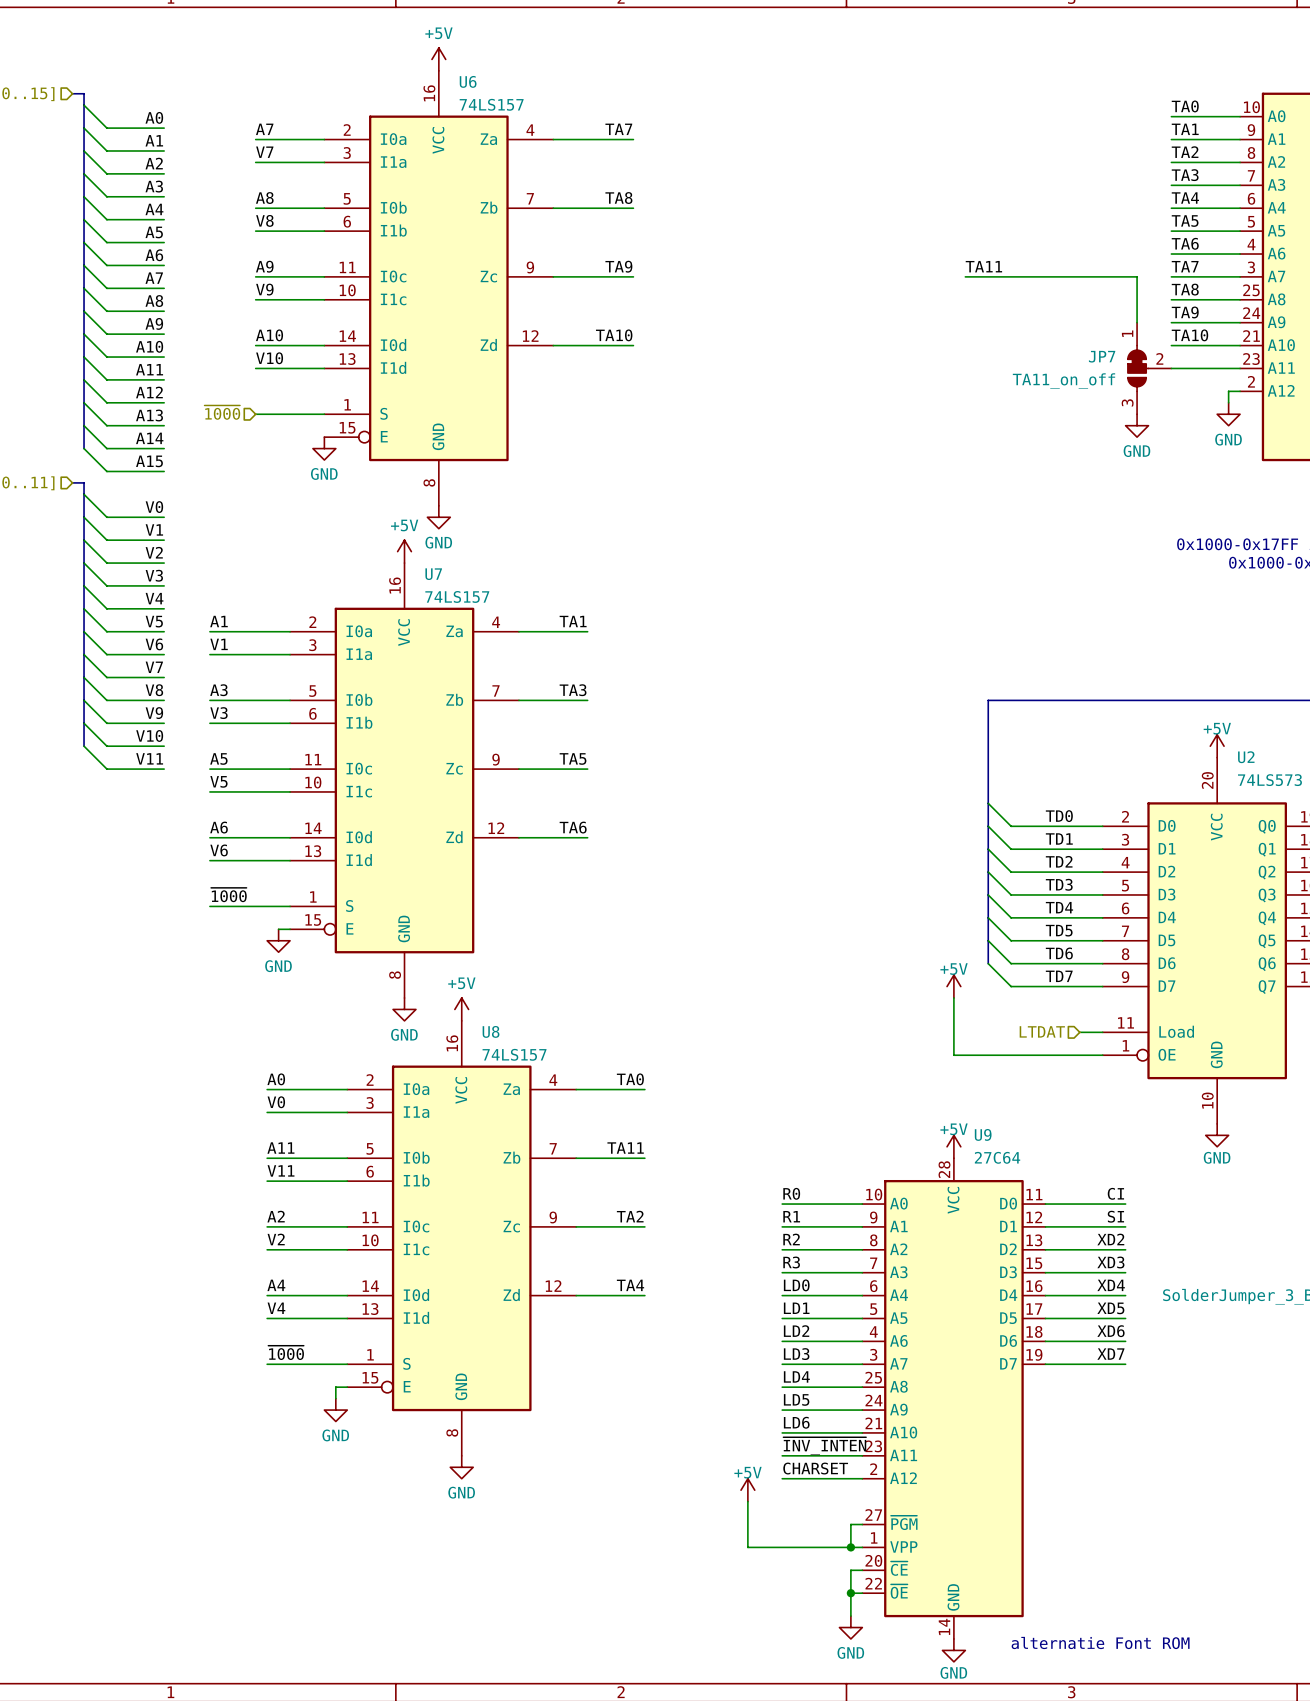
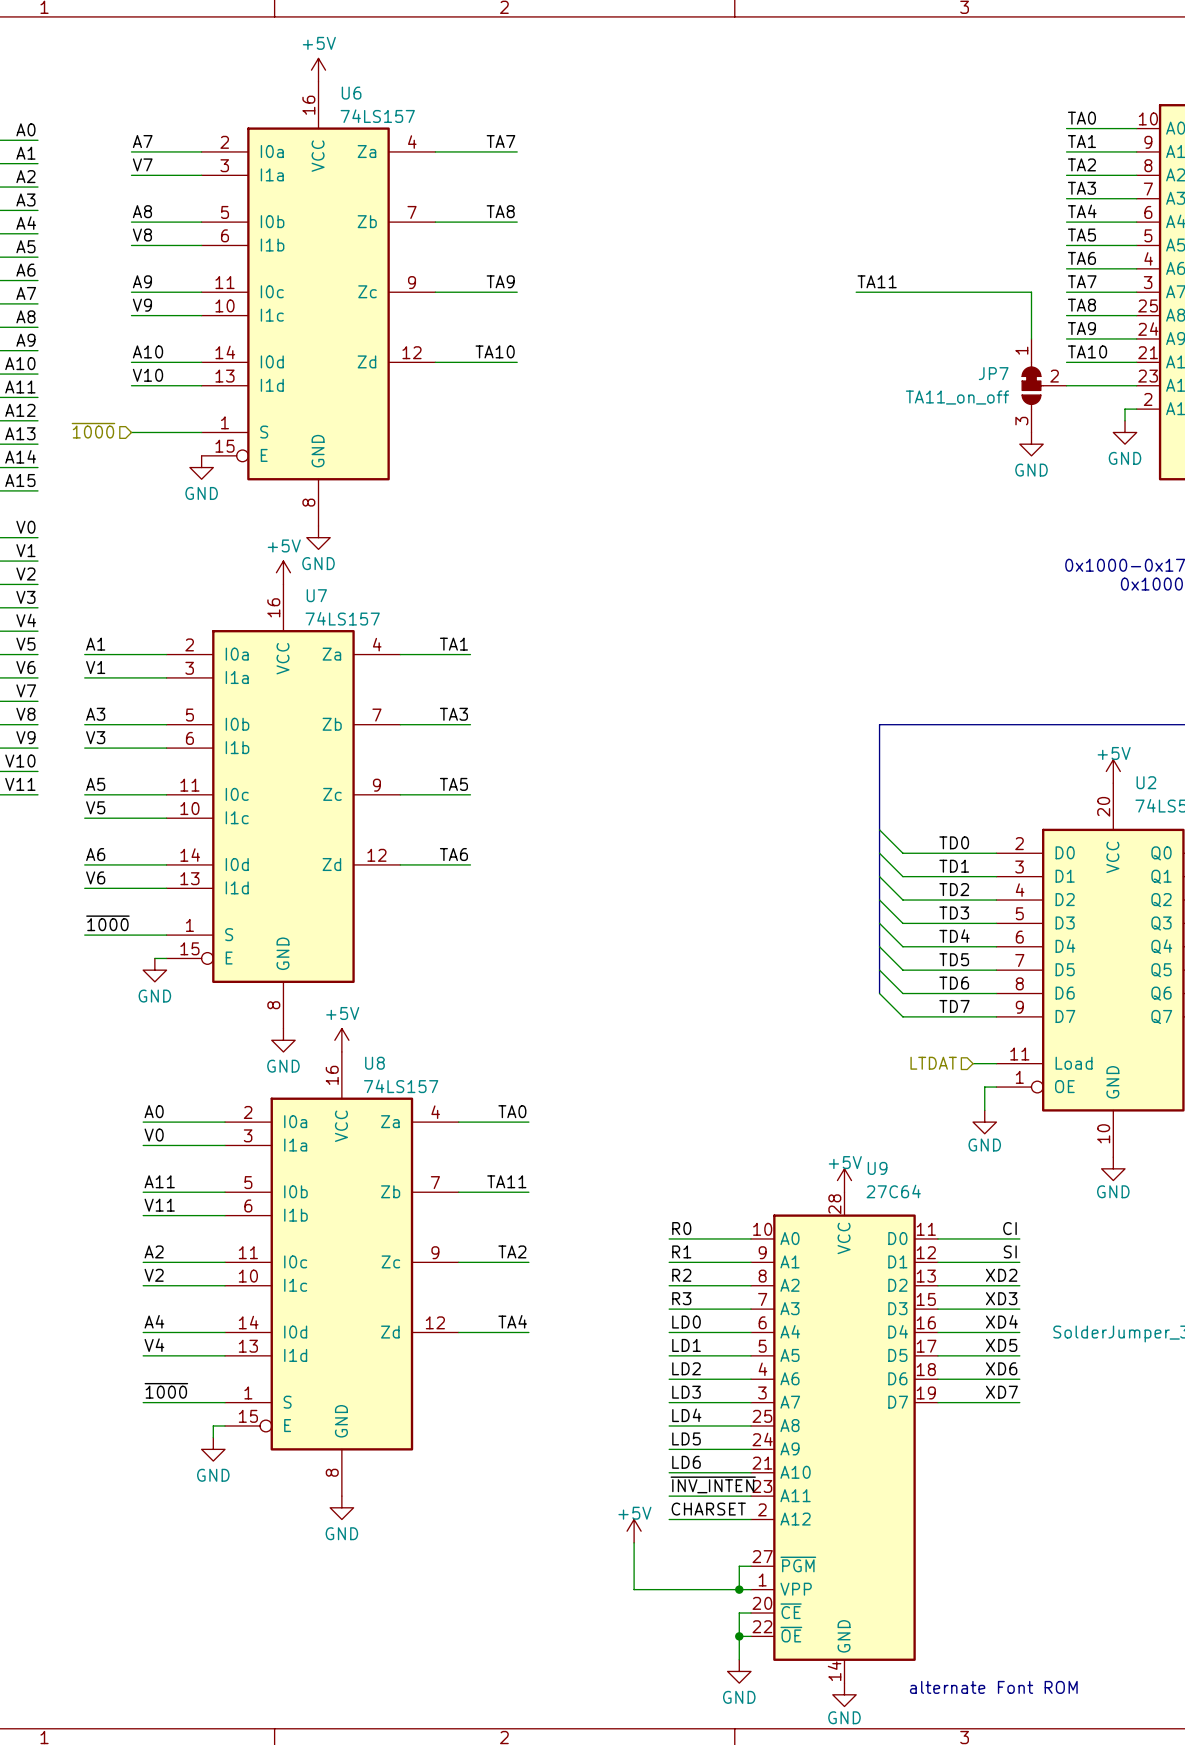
power symbol: +5V (953, 986) -> none
wire: (953, 998) (953, 1055) (1091, 1055) -> (984, 1110) (984, 1087)
power symbol: none -> GND (984, 1122)
text: alternatie Font ROM (1100, 1642) -> alternate Font ROM (993, 1687)

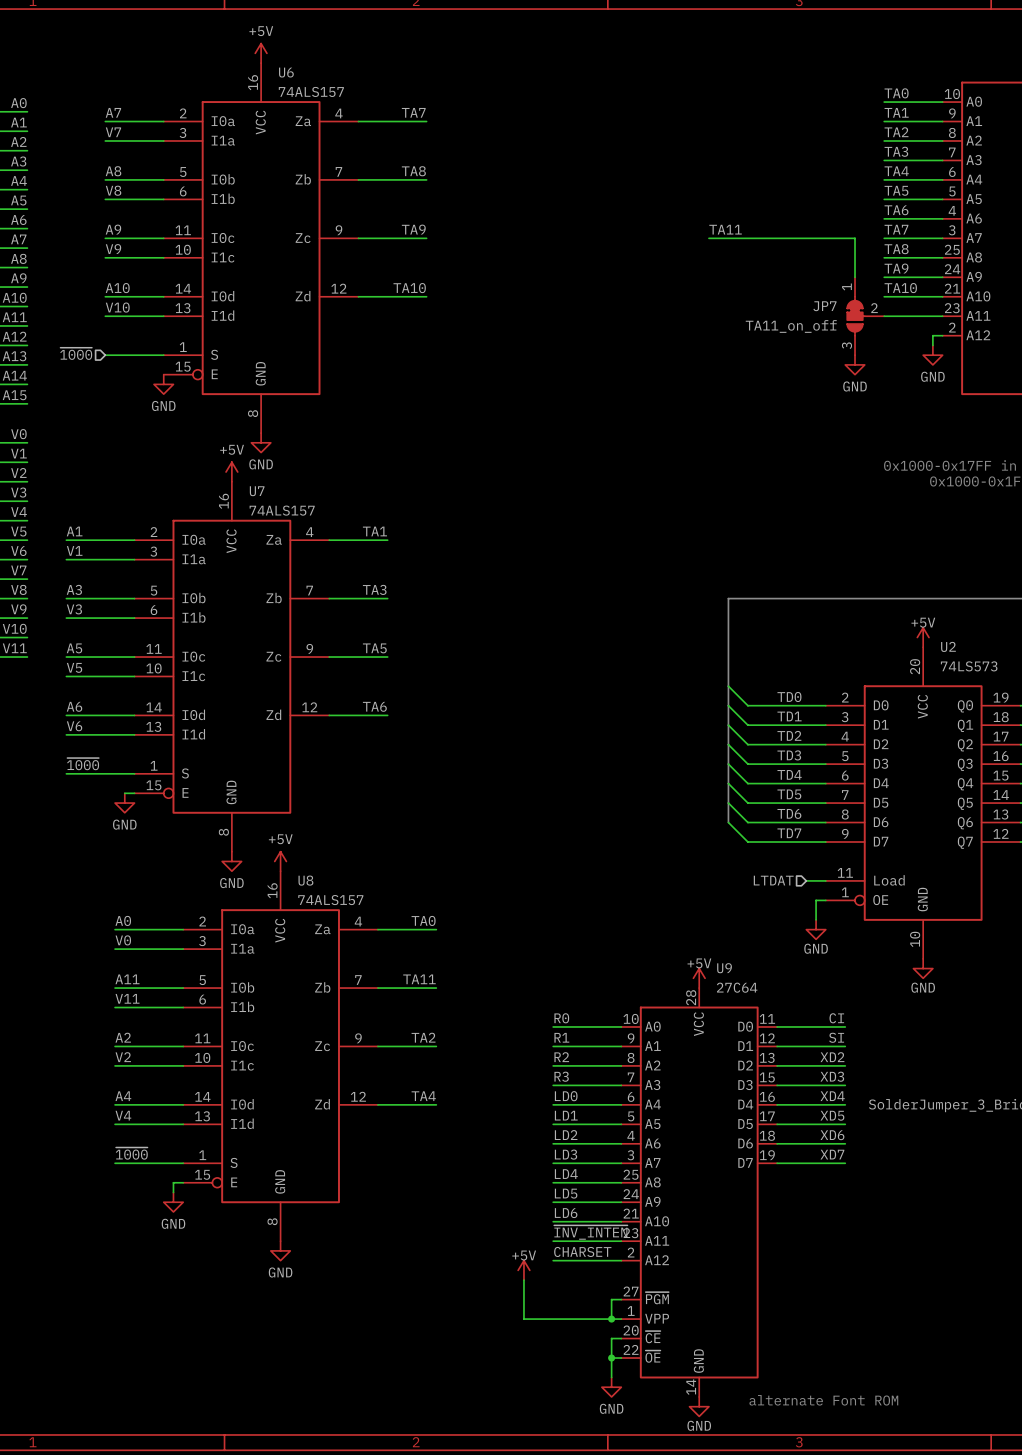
U6 value: 74LS157 (377, 116) -> 74ALS157 (311, 91)
U7 value: 74LS157 (342, 618) -> 74ALS157 (282, 510)
U8 value: 74LS157 (401, 1086) -> 74ALS157 (330, 900)

